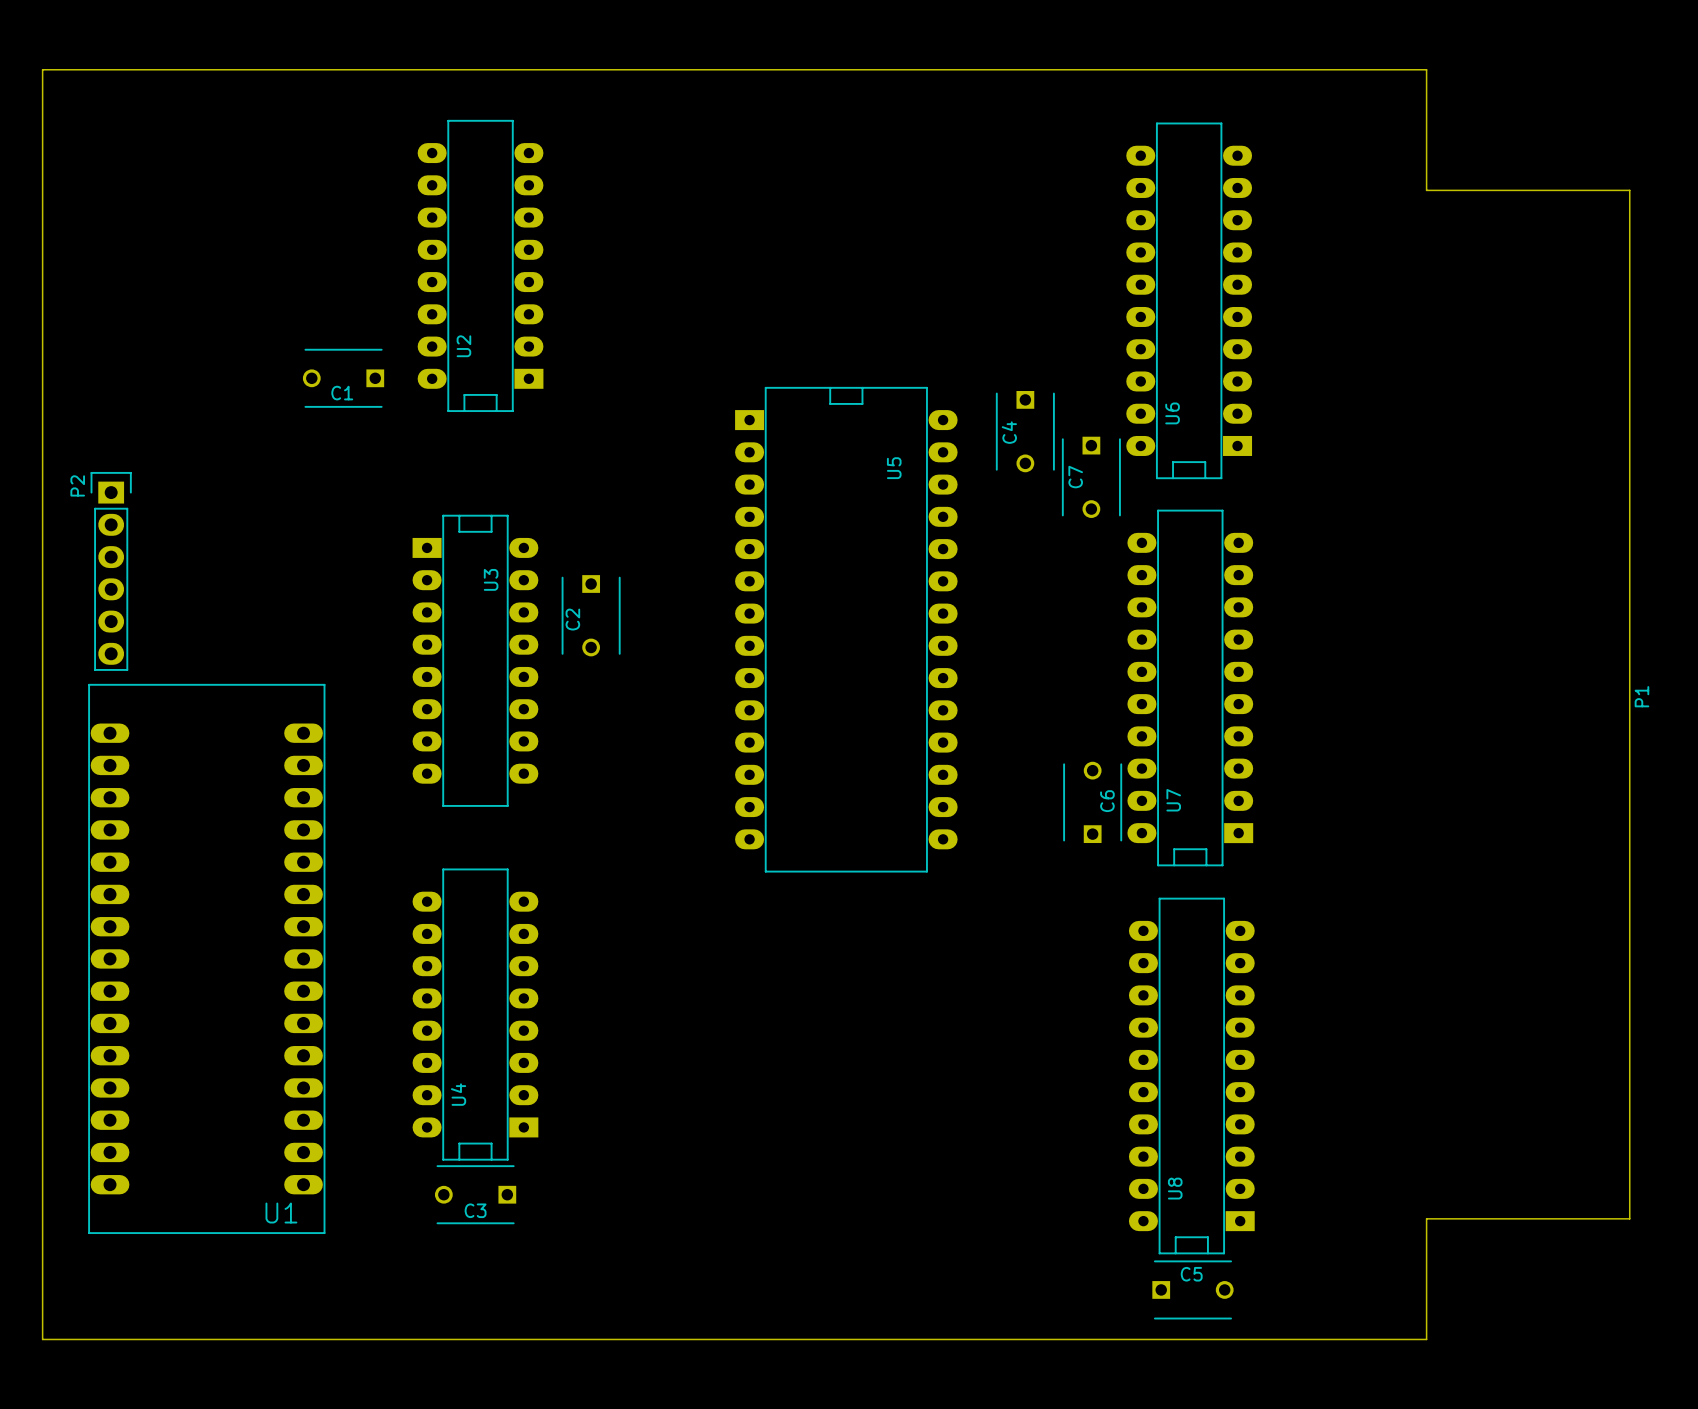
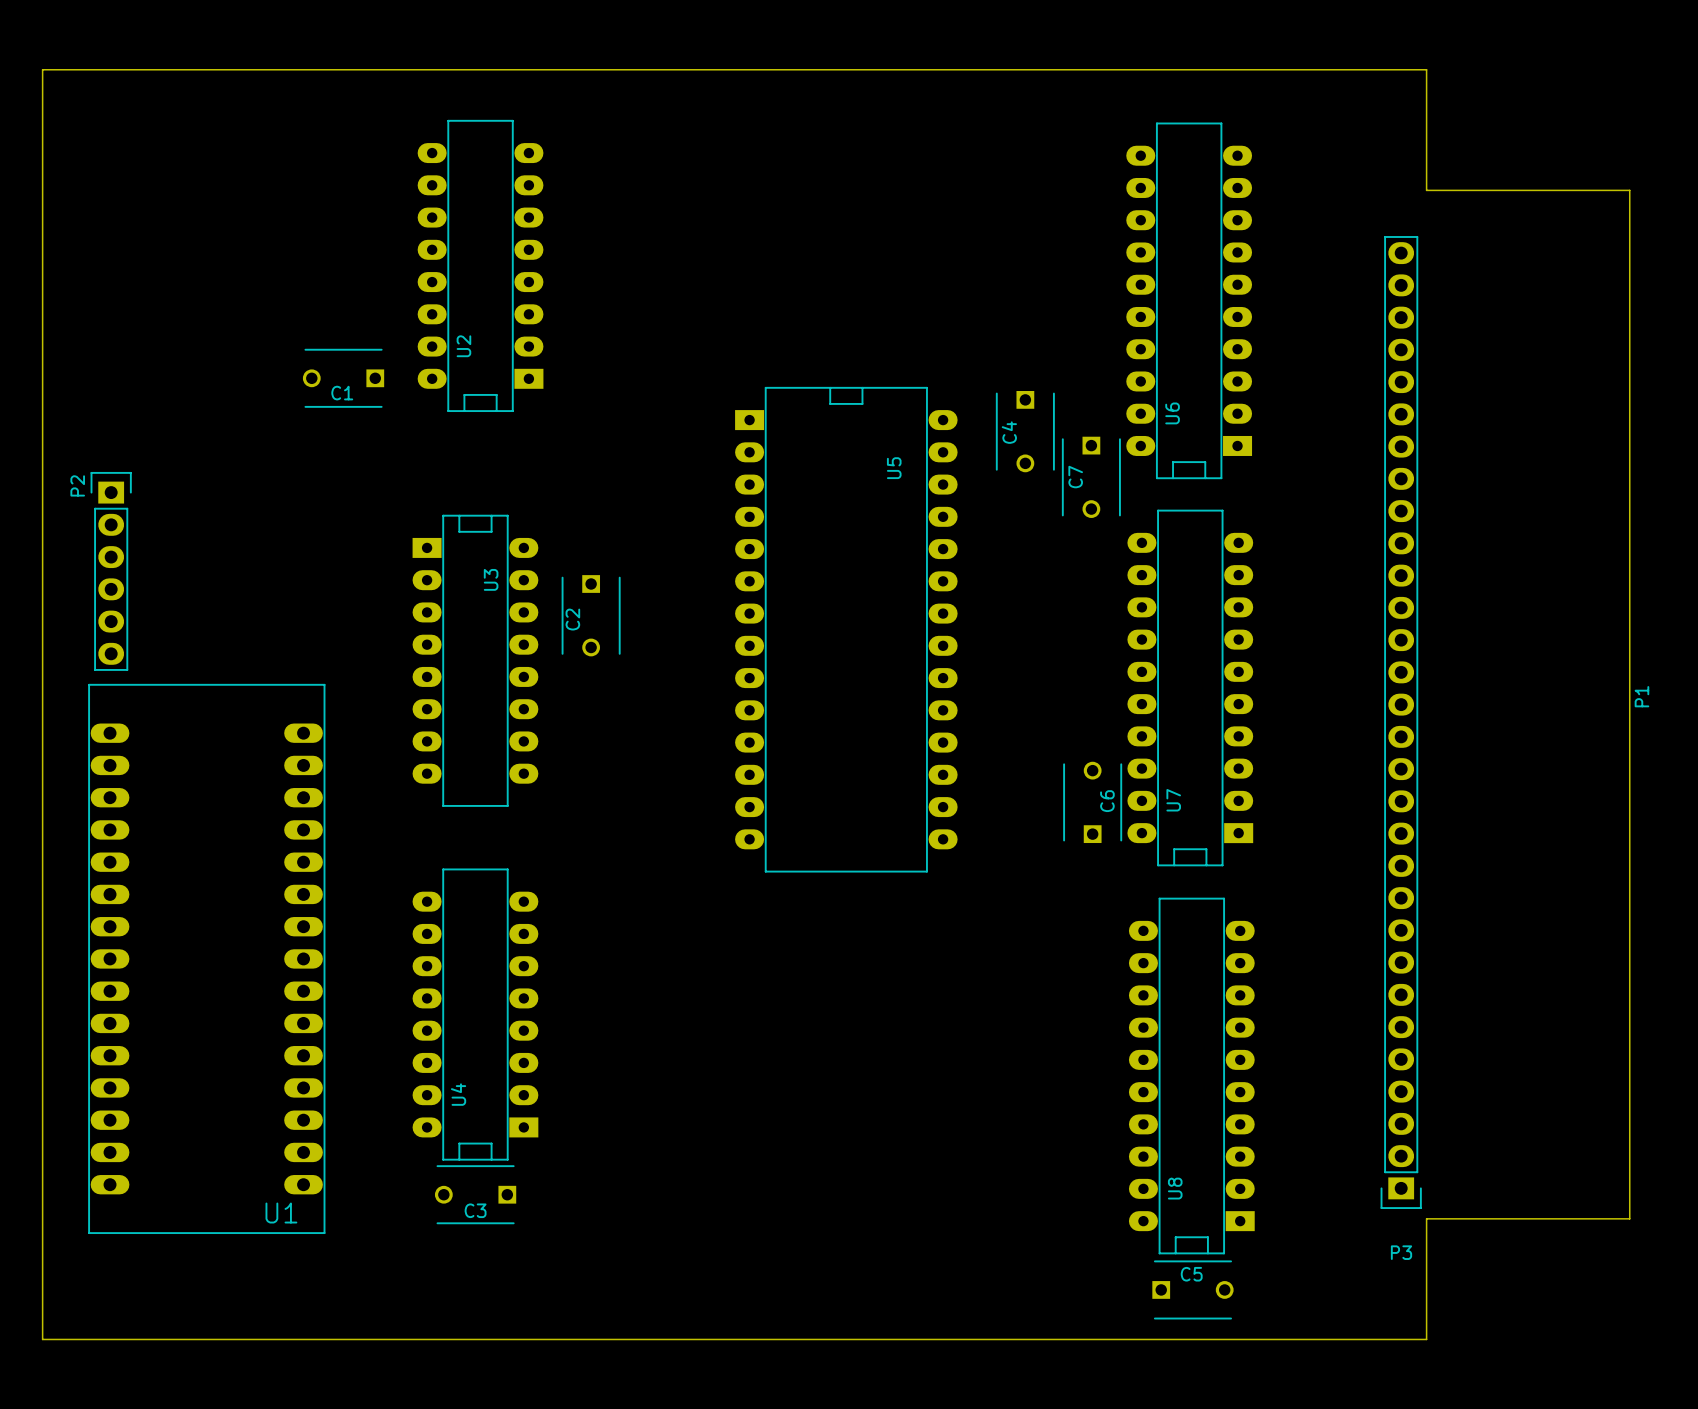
P3: none -> (1401, 722)

